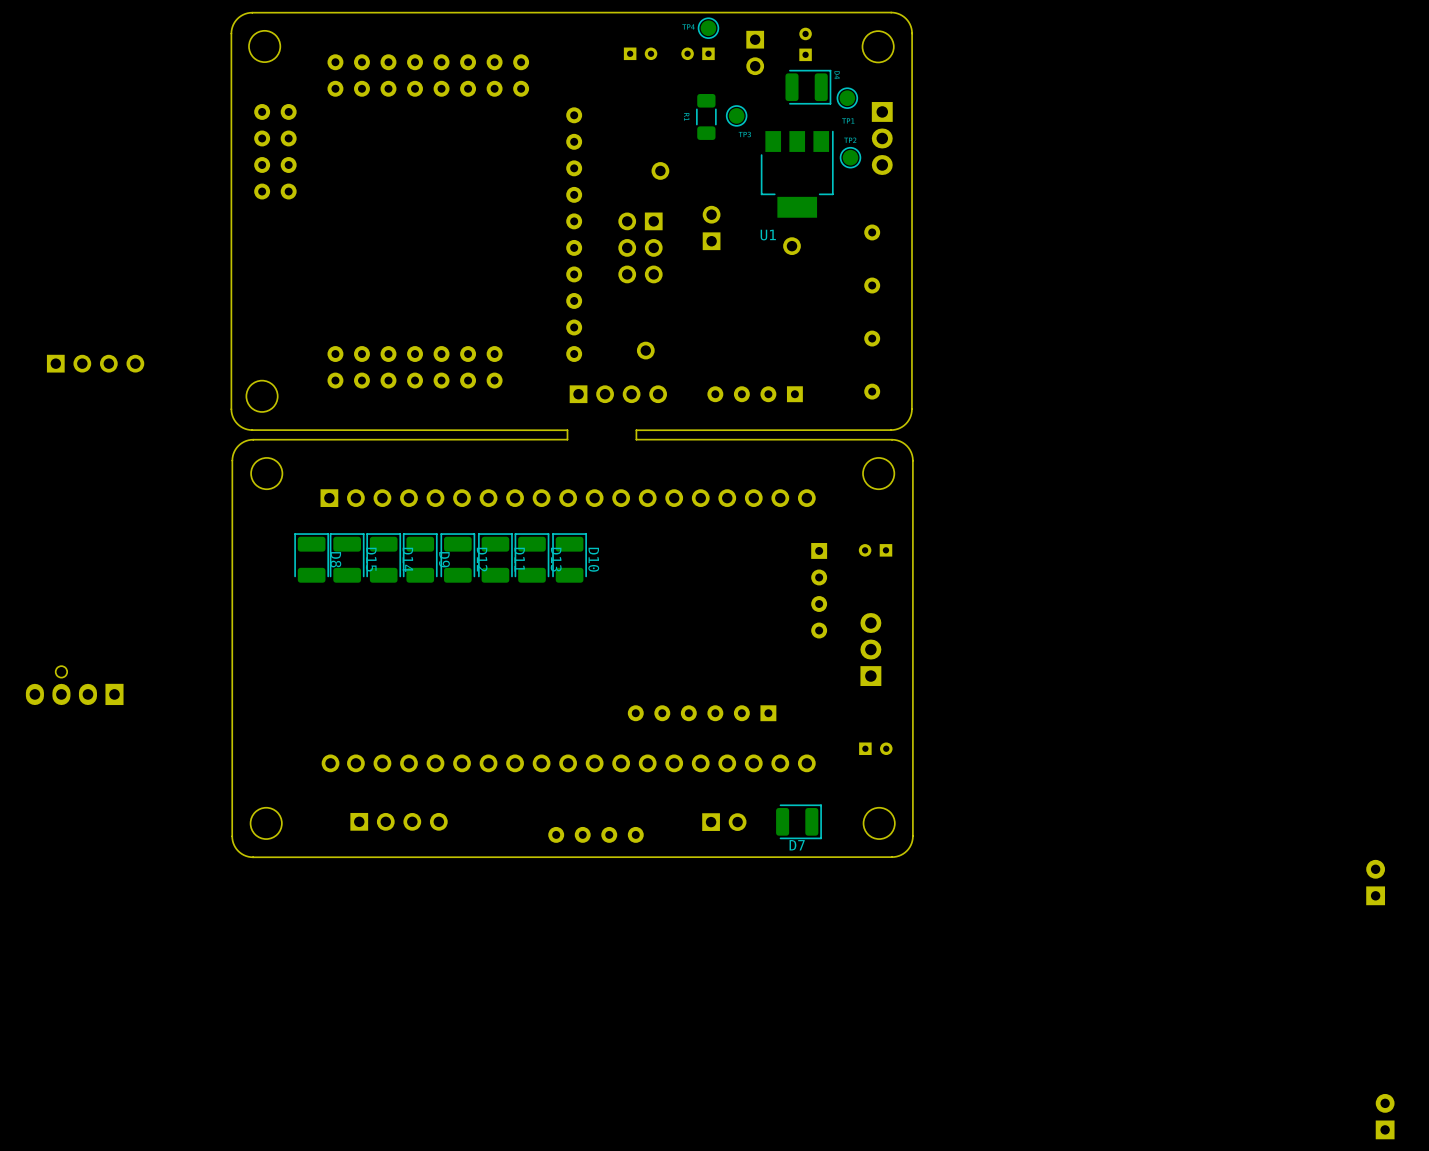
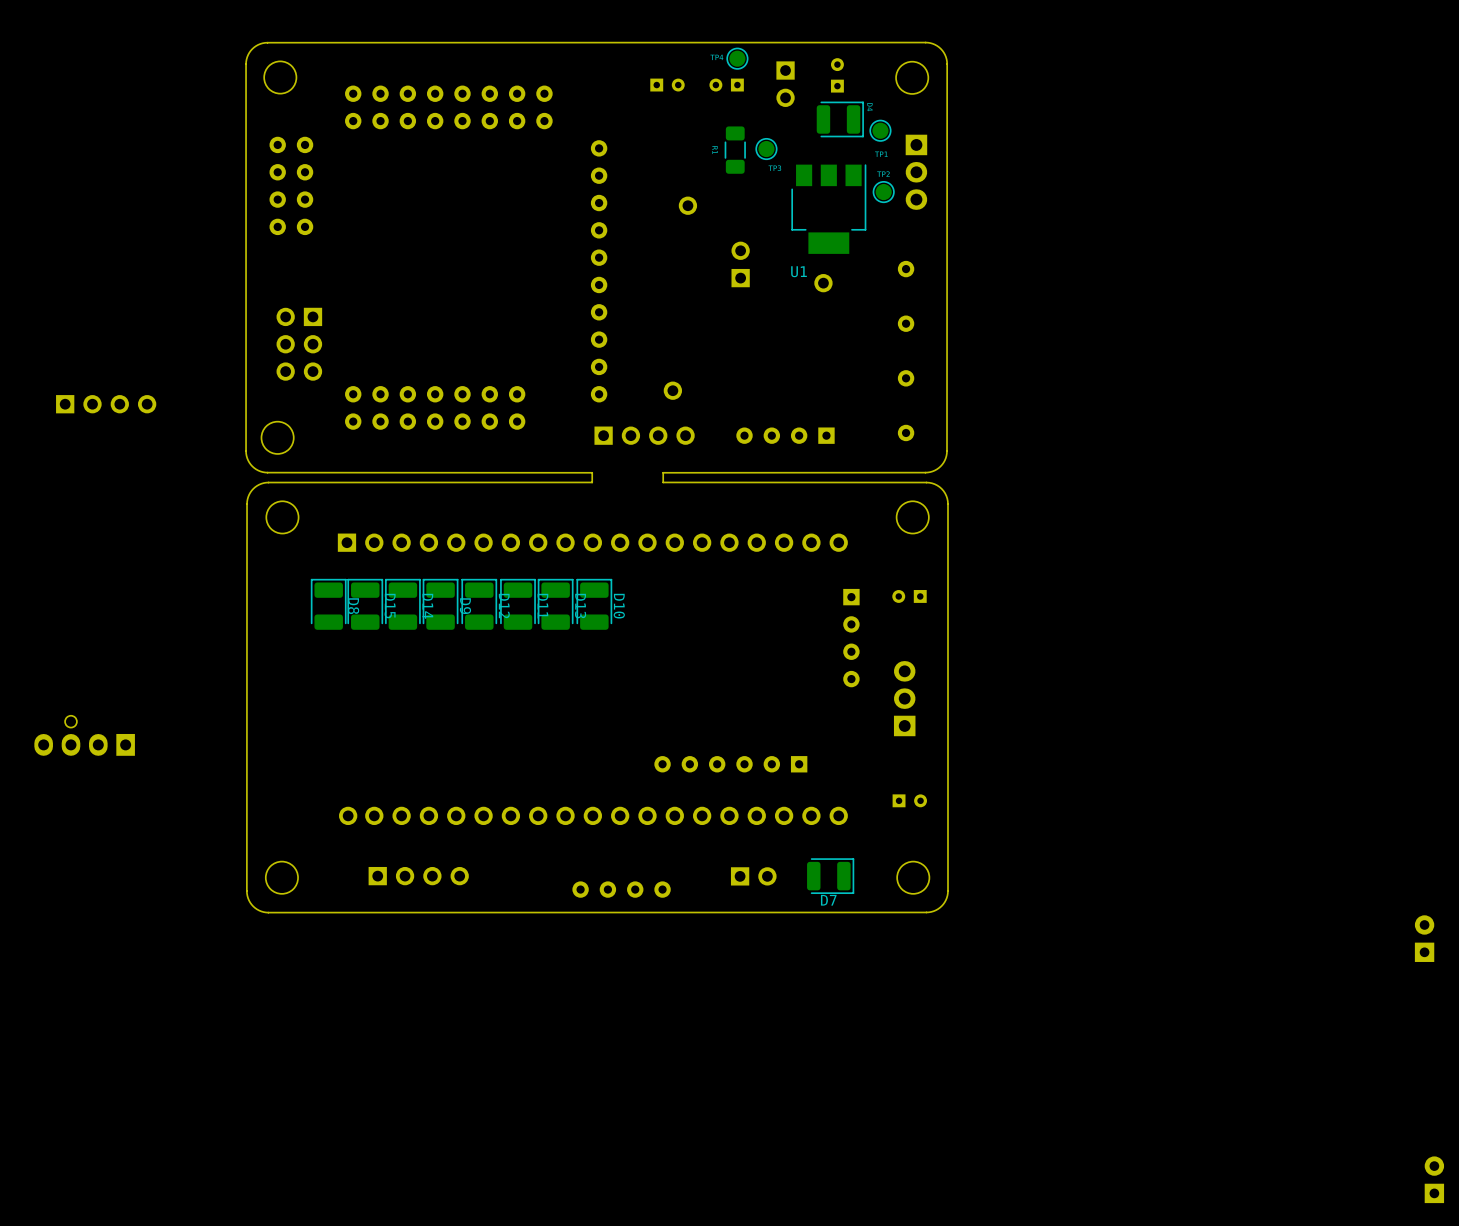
part: (640, 247) -> none
part: none -> (299, 344)

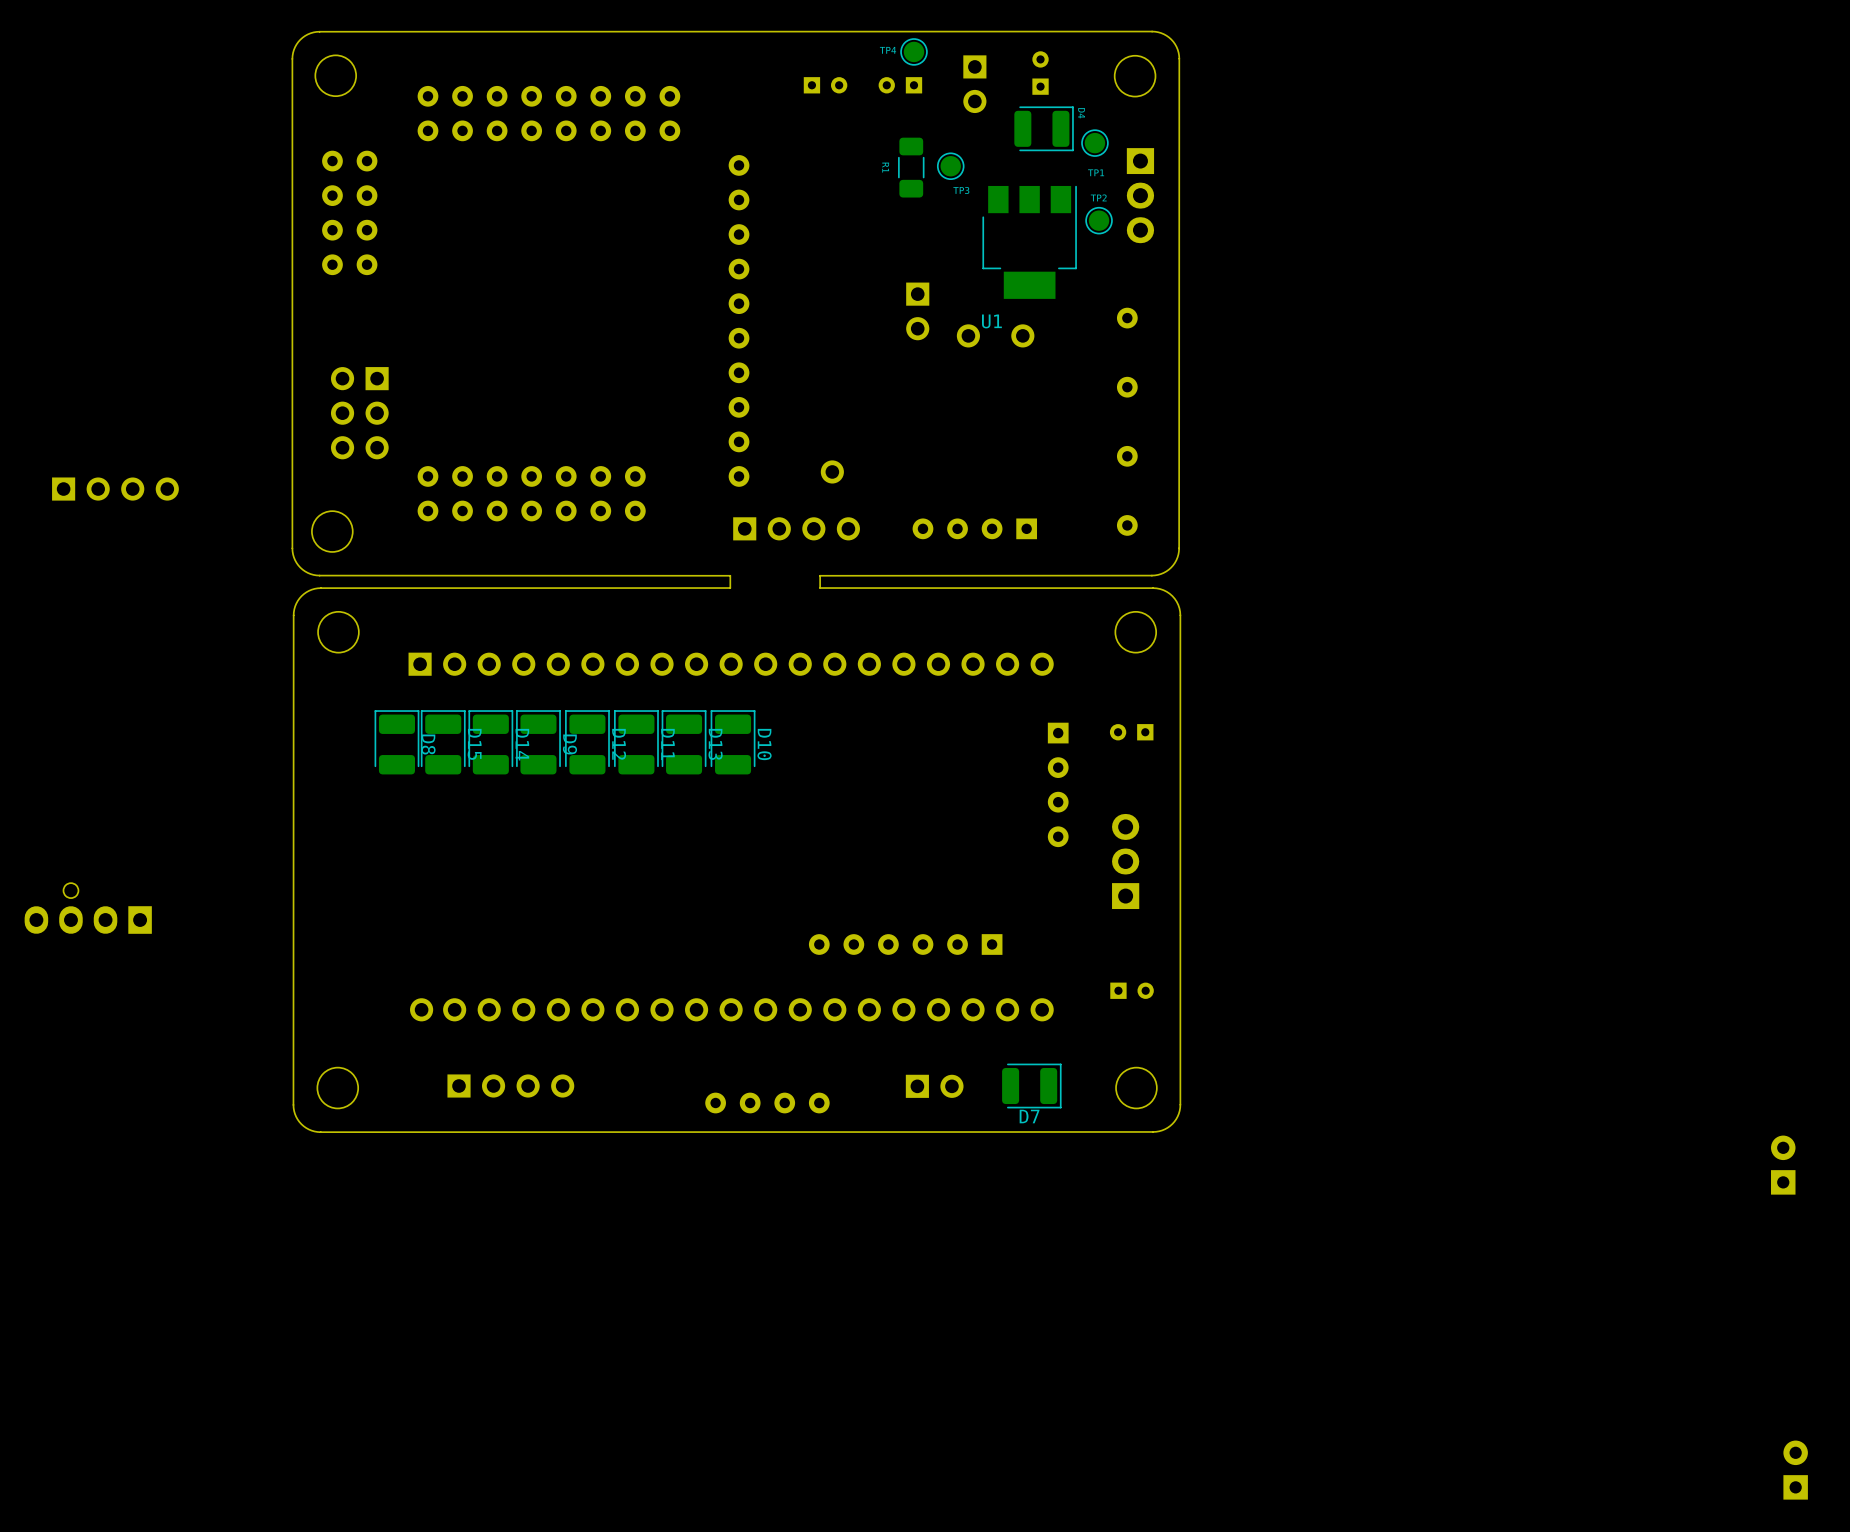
part position: (687, 205) -> (968, 335)
part rotation: 0° (740, 264) -> 180° (917, 311)

